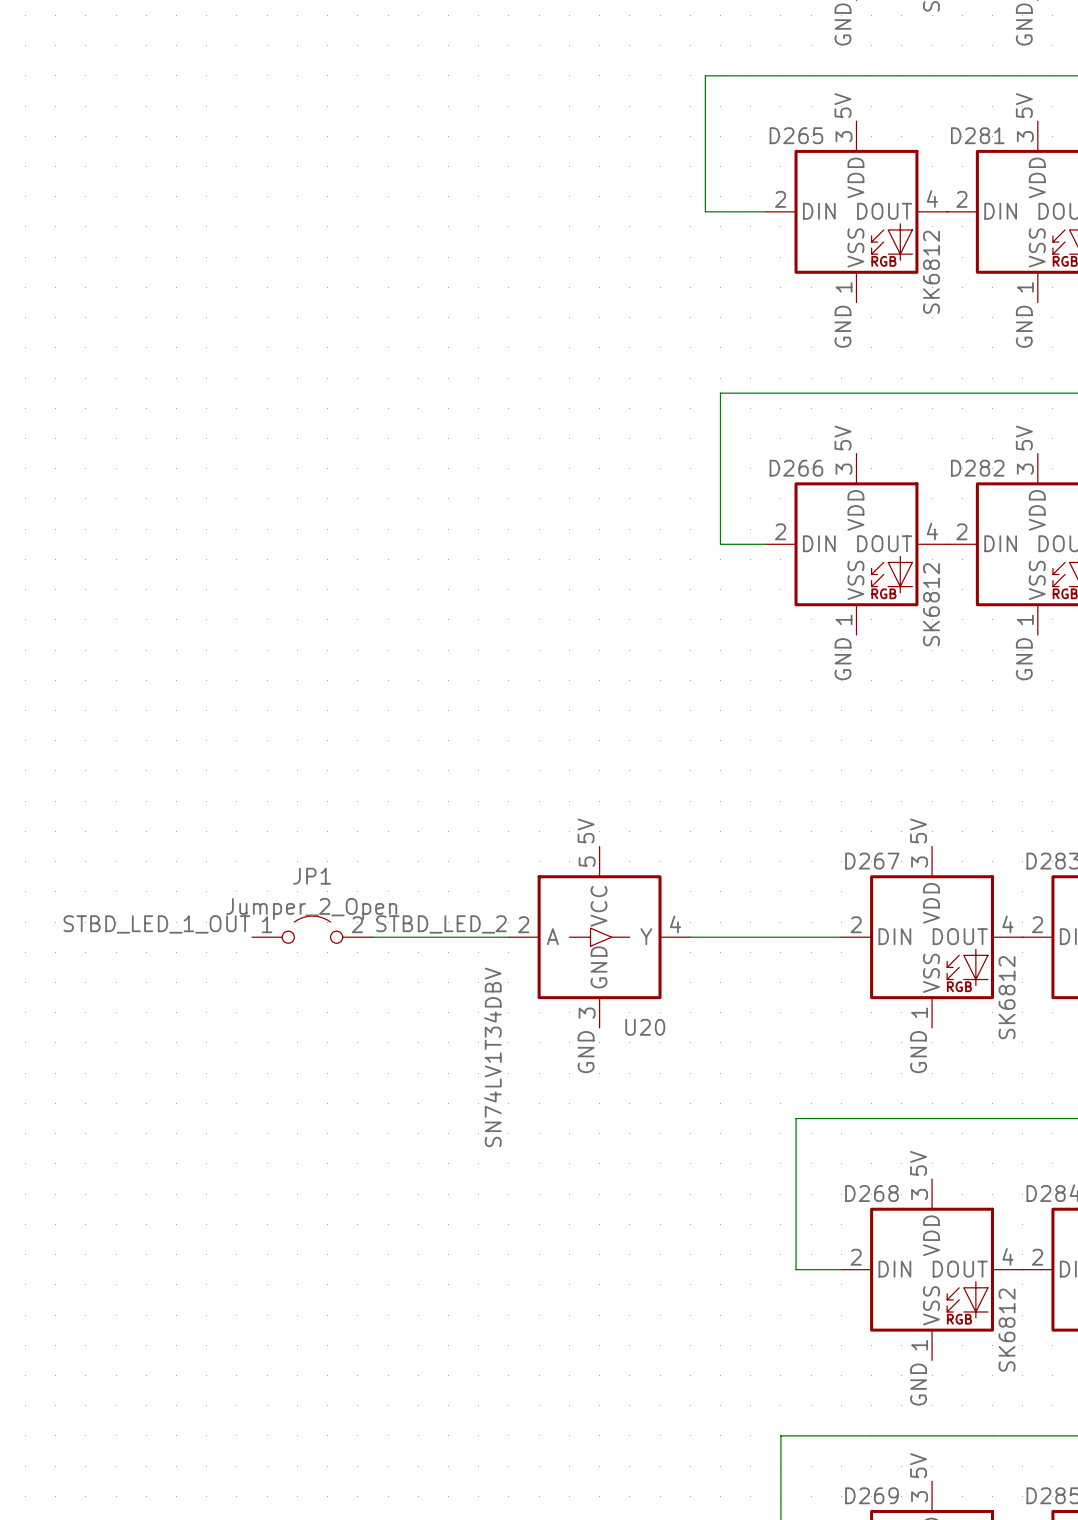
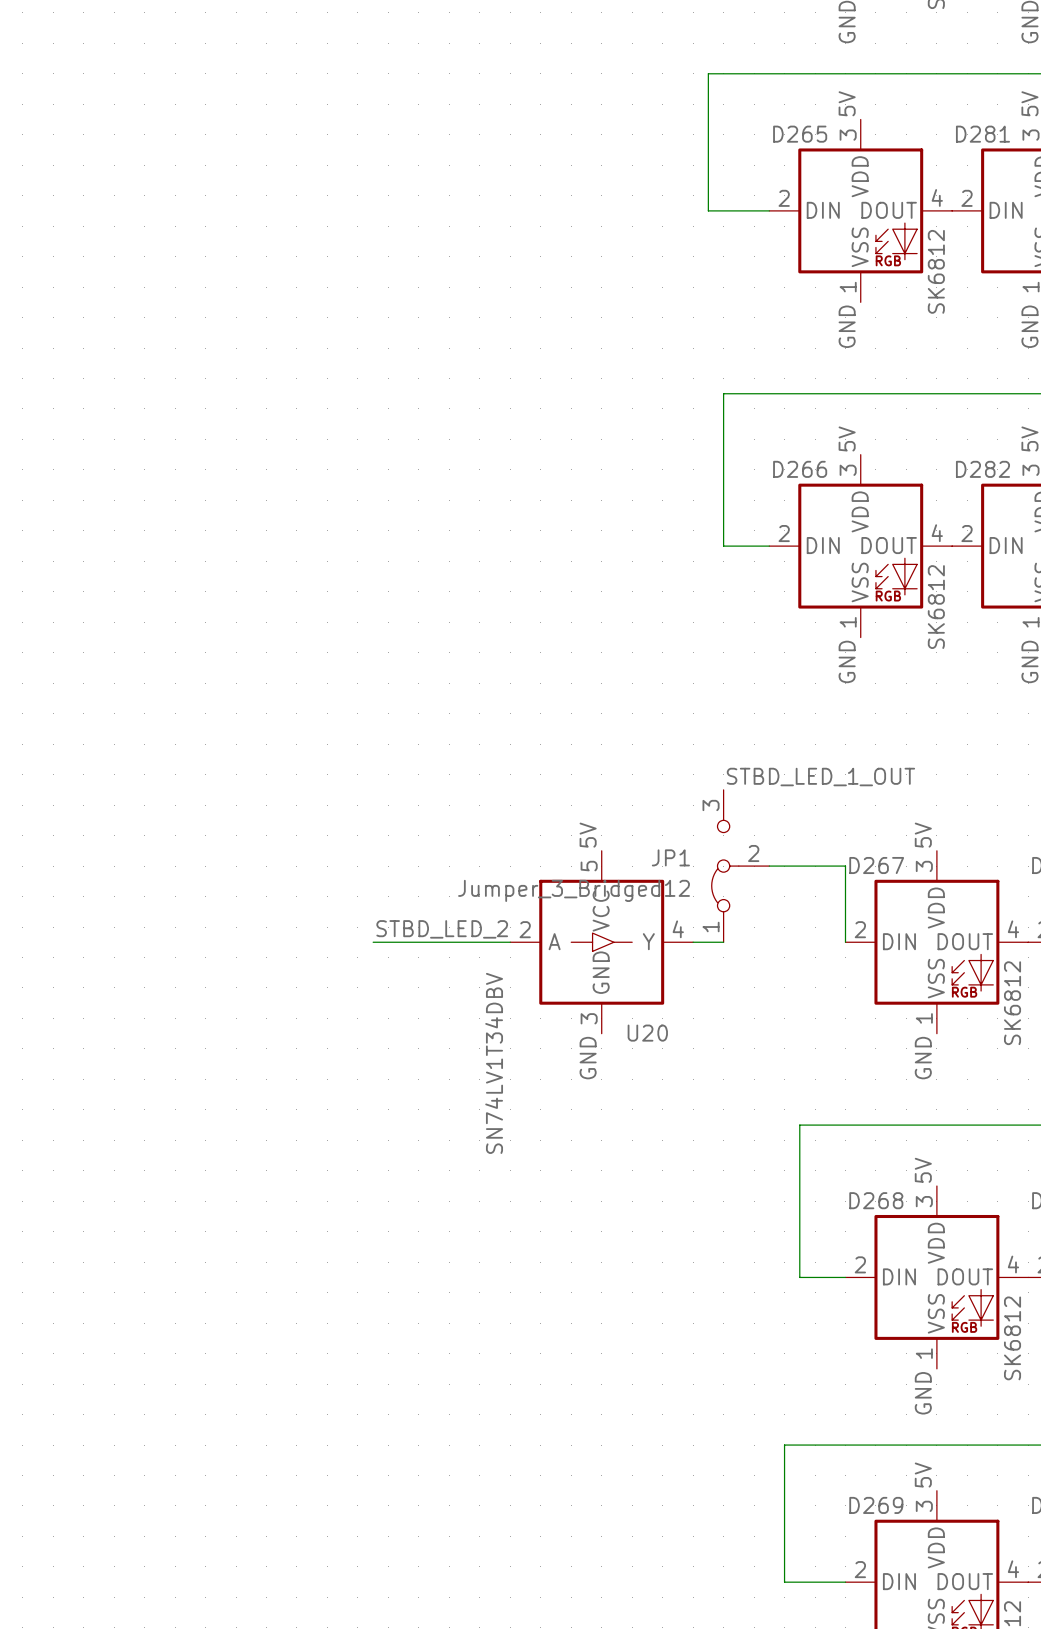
label: none -> STBD_LED_1_OUT (820, 777)
JP1 name position: JP1 (312, 876) -> JP1 (670, 857)
JP1 value: Jumper_2_Open (311, 908) -> Jumper_3_Bridged12 (574, 890)
JP1 symbol: [252, 916, 373, 944] -> [711, 789, 770, 943]
label: STBD_LED_1_OUT (156, 924) -> none
wire: (720, 937) (841, 937) -> (769, 866) (845, 866) (845, 942)

